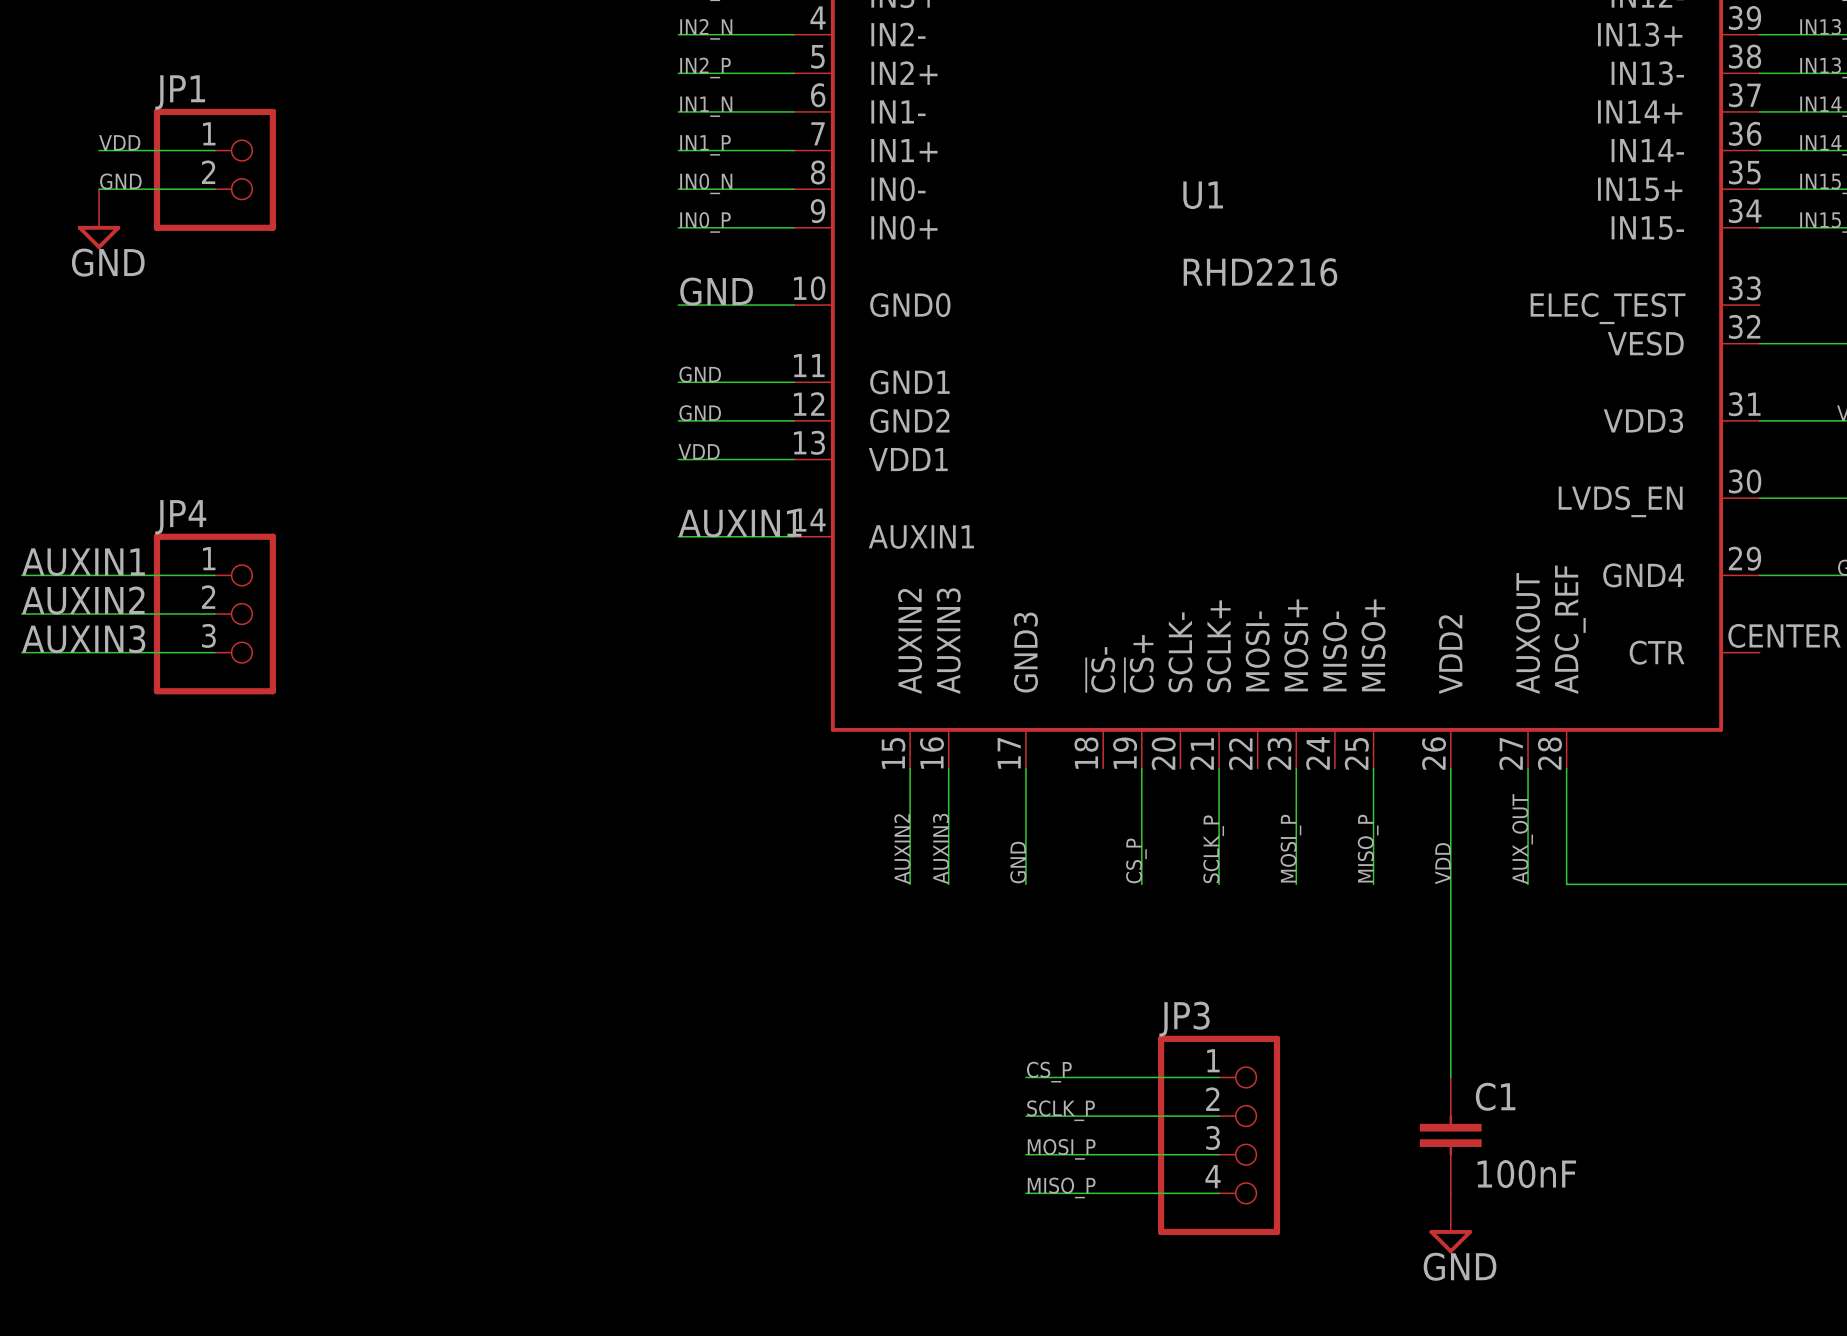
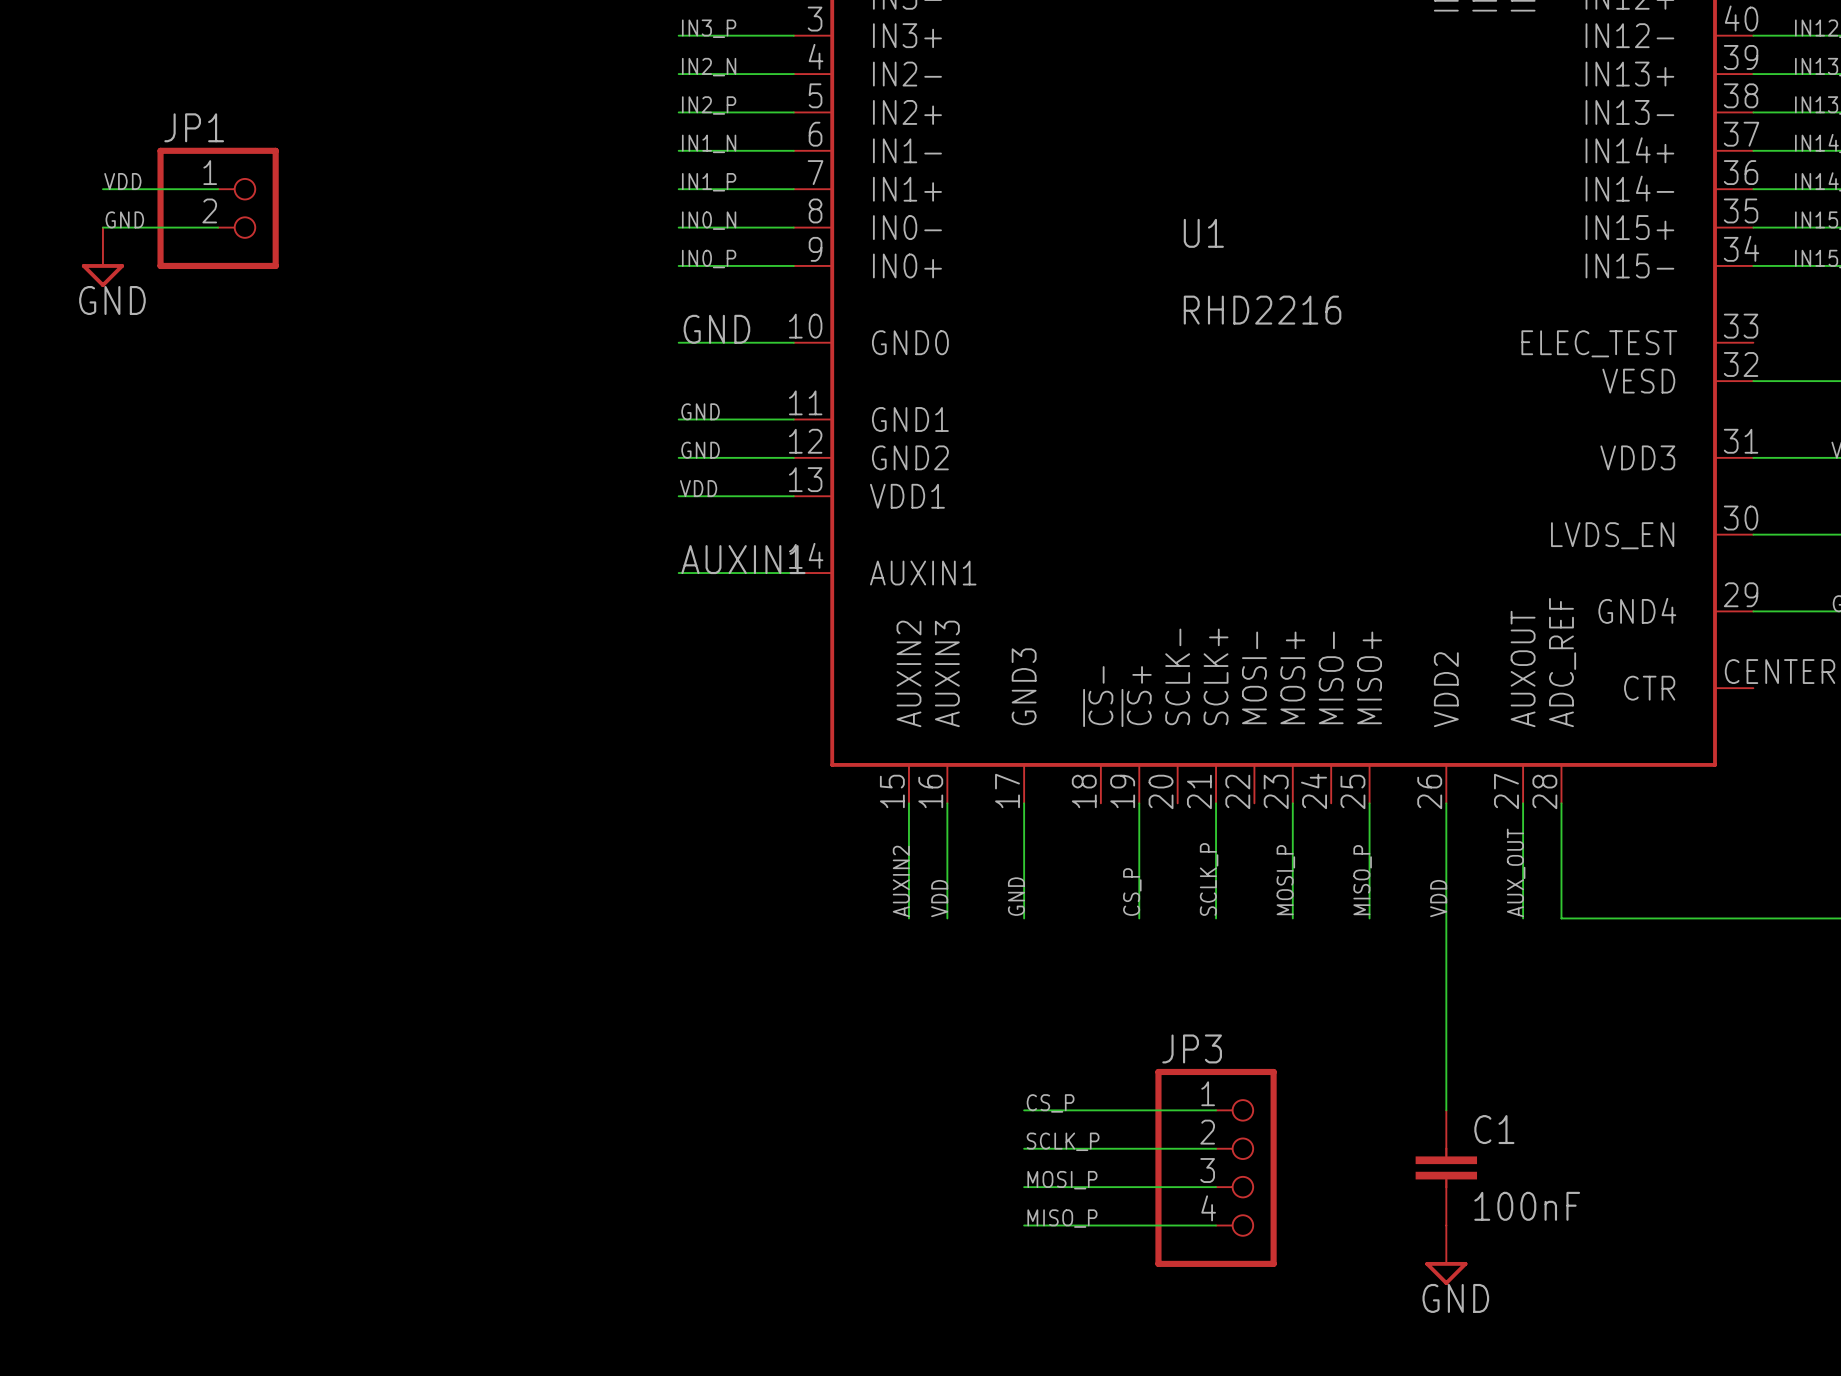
label: AUXIN1 (83, 562) -> none
wire: (21, 575) (214, 575) -> none
label: AUXIN2 (83, 600) -> none
wire: (21, 614) (214, 614) -> none
JP4: (214, 614) -> none
label: AUXIN3 (83, 639) -> none
wire: (21, 652) (214, 652) -> none
label: AUXIN3 (940, 849) -> VDD (939, 898)

